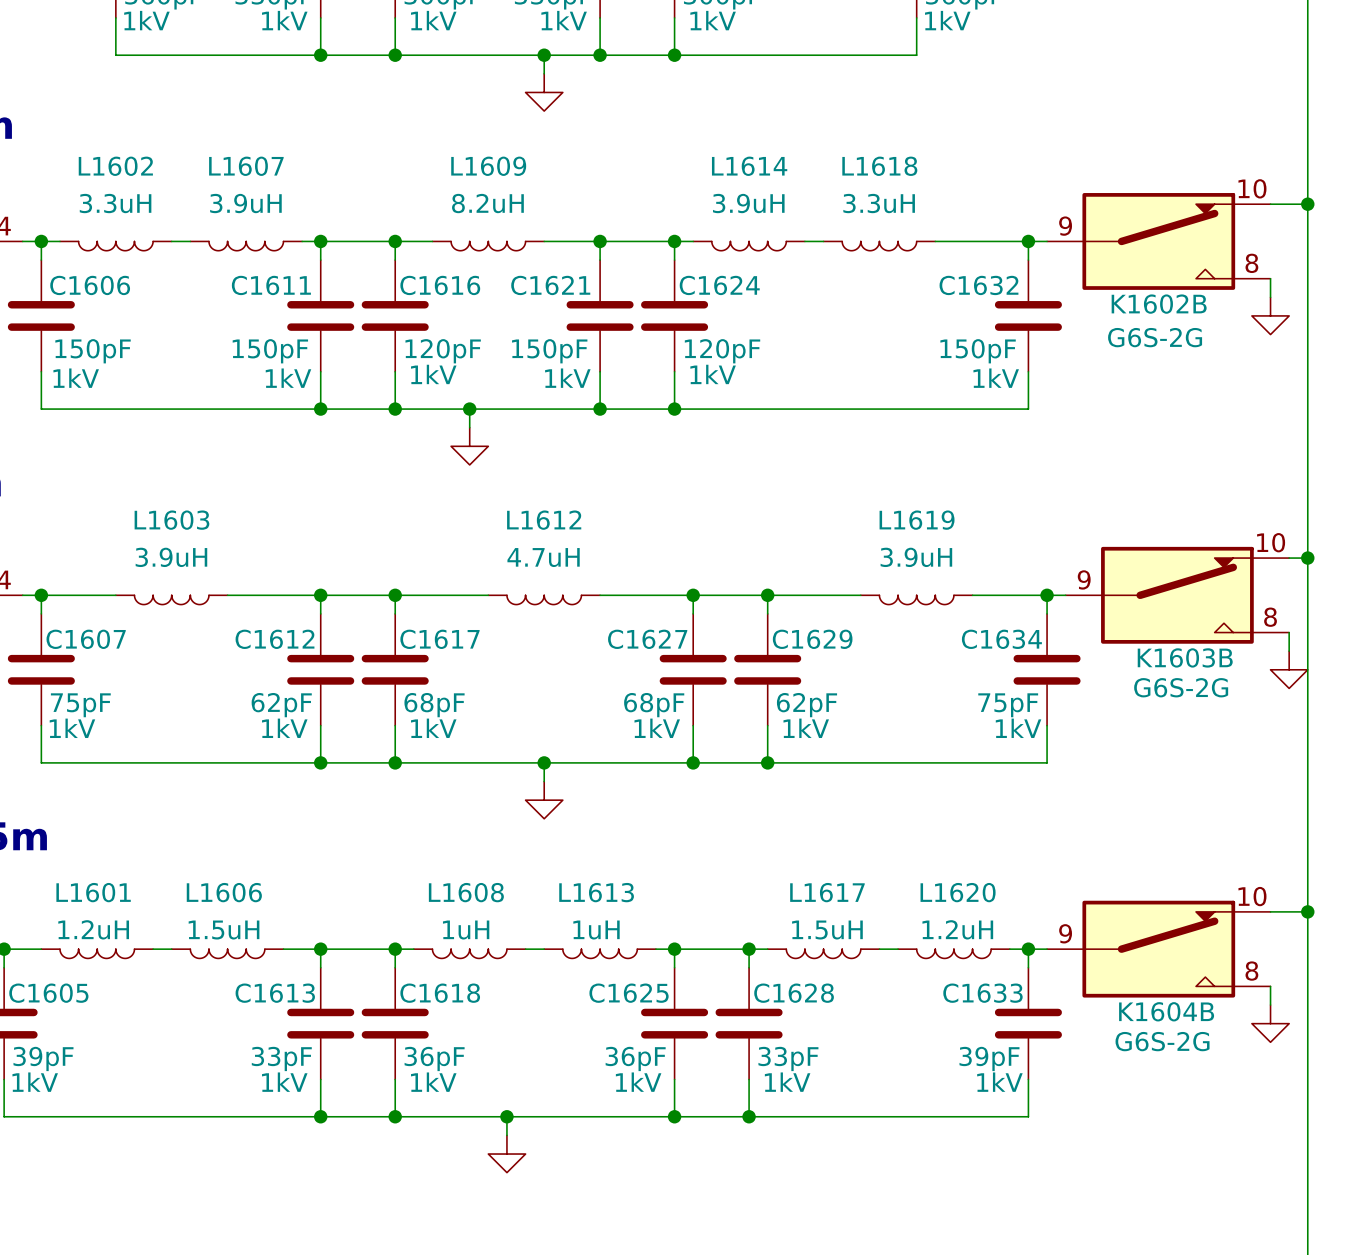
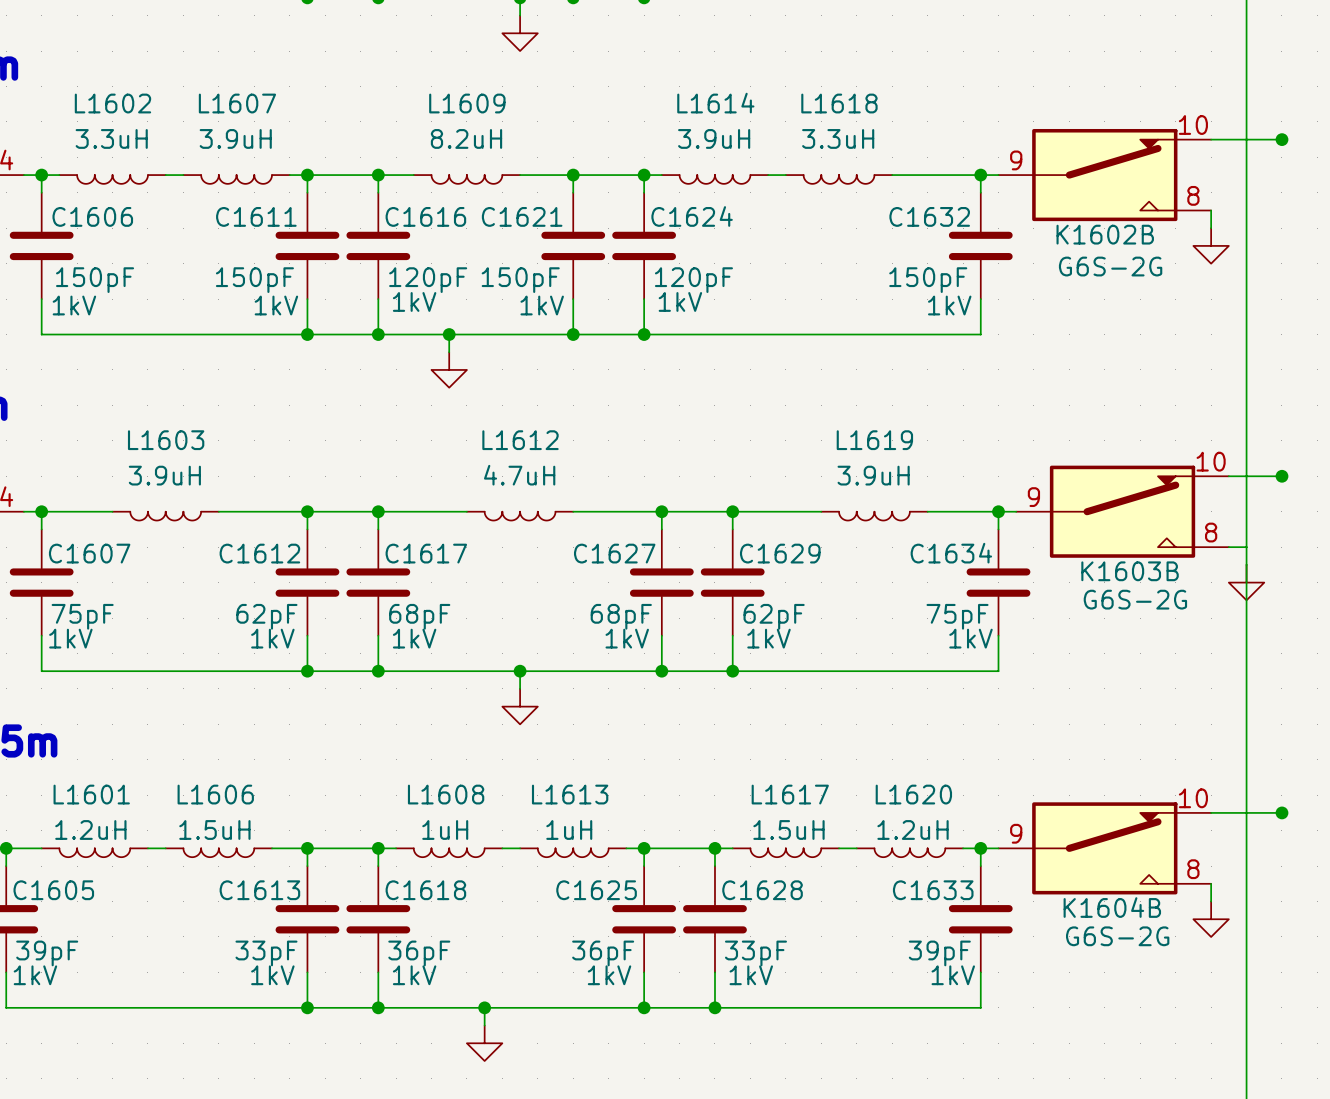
wire: none -> (1246, 139) (1281, 139)
junction position: (1307, 204) -> (1281, 139)
wire: none -> (1246, 476) (1281, 476)
junction position: (1307, 558) -> (1281, 476)
wire: (1289, 632) (1289, 651) -> (1228, 547) (1246, 547)
power symbol position: (1289, 669) -> (1246, 582)
wire: none -> (1246, 812) (1281, 812)
junction position: (1307, 911) -> (1281, 812)

